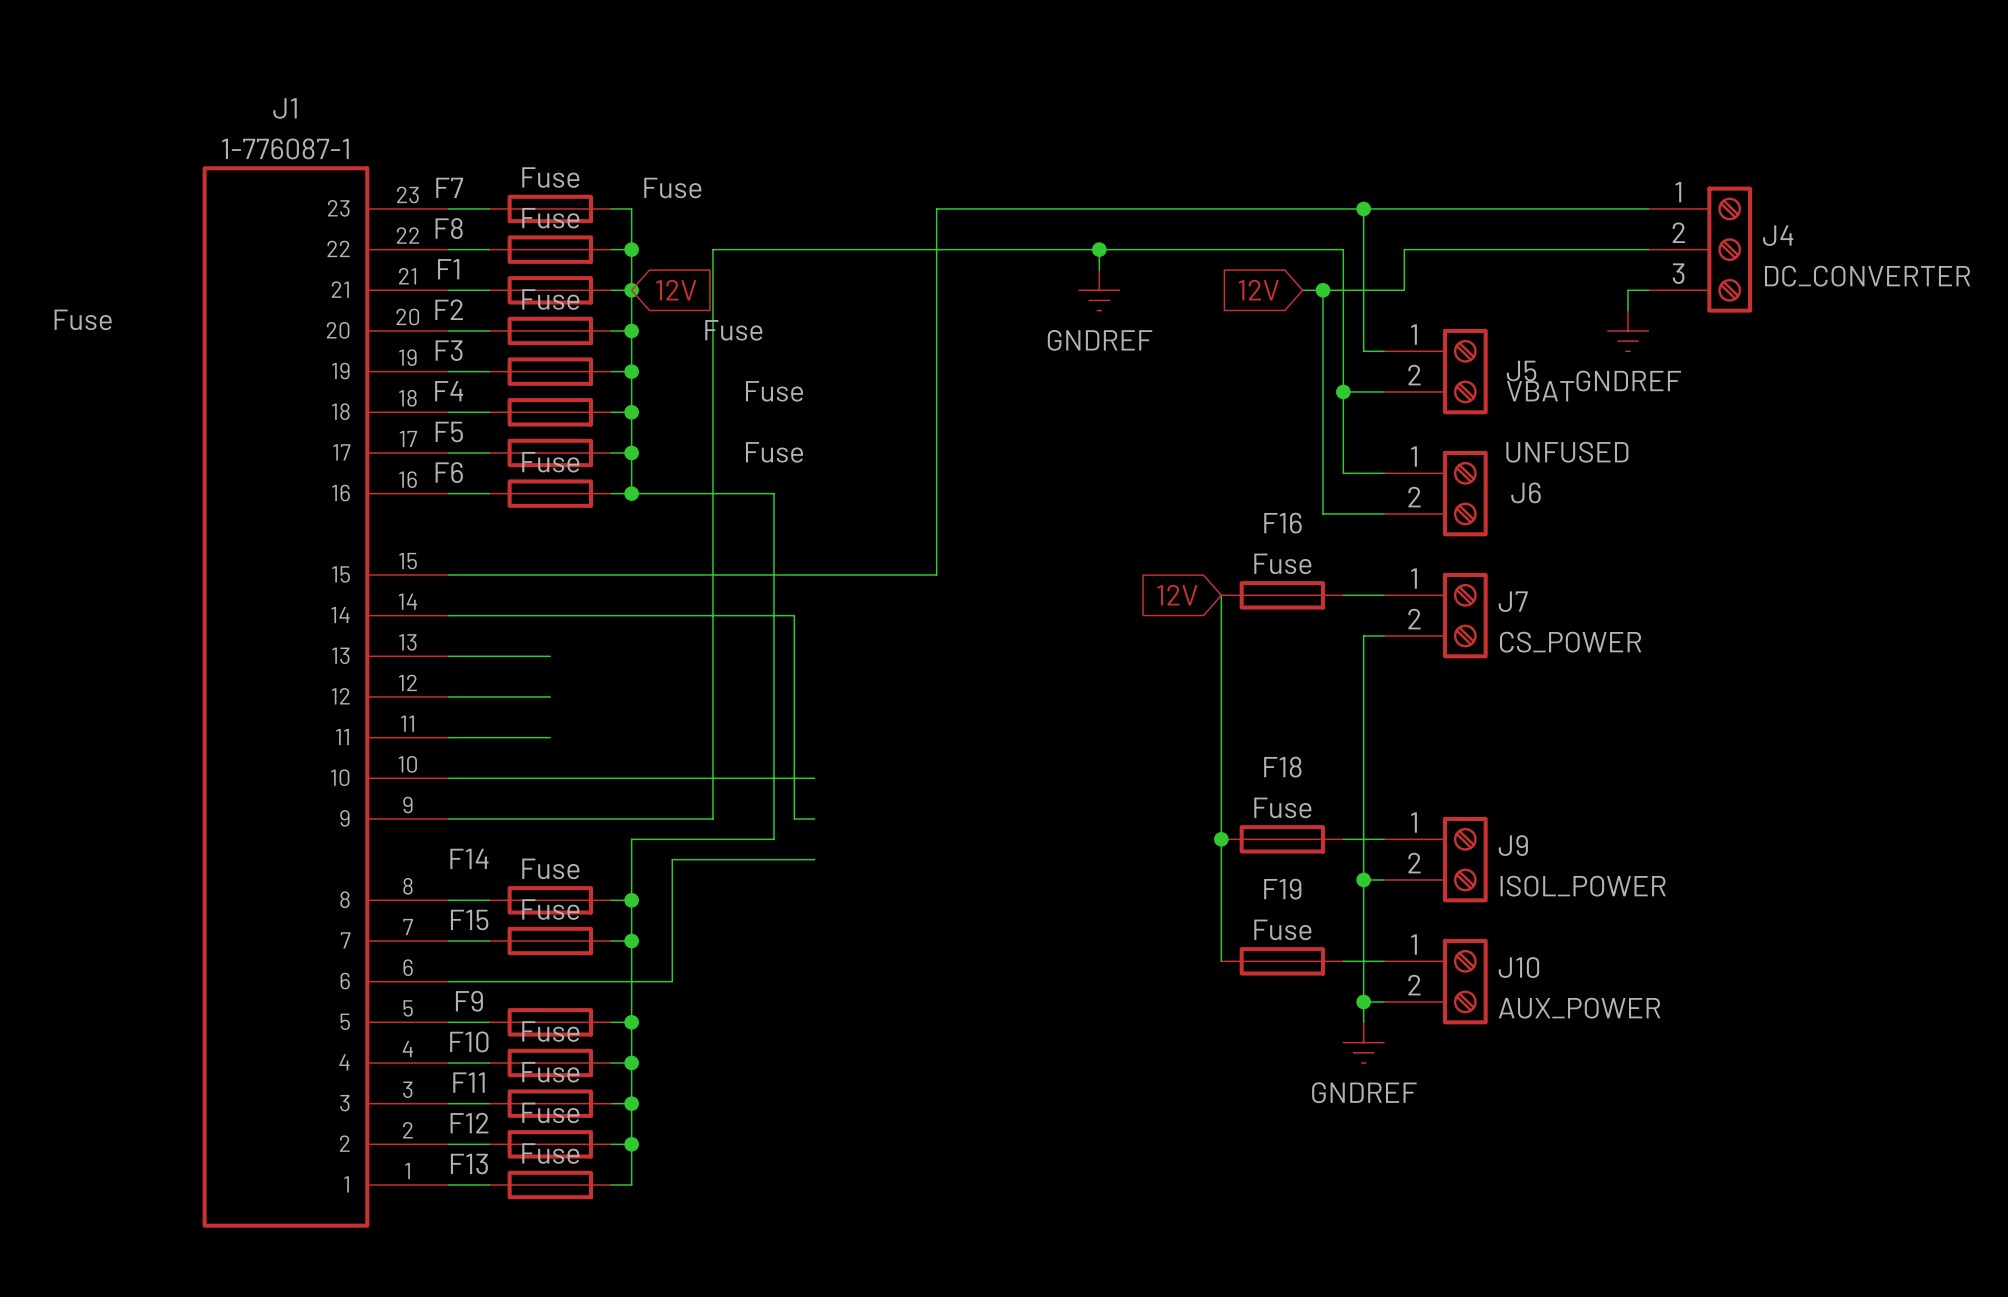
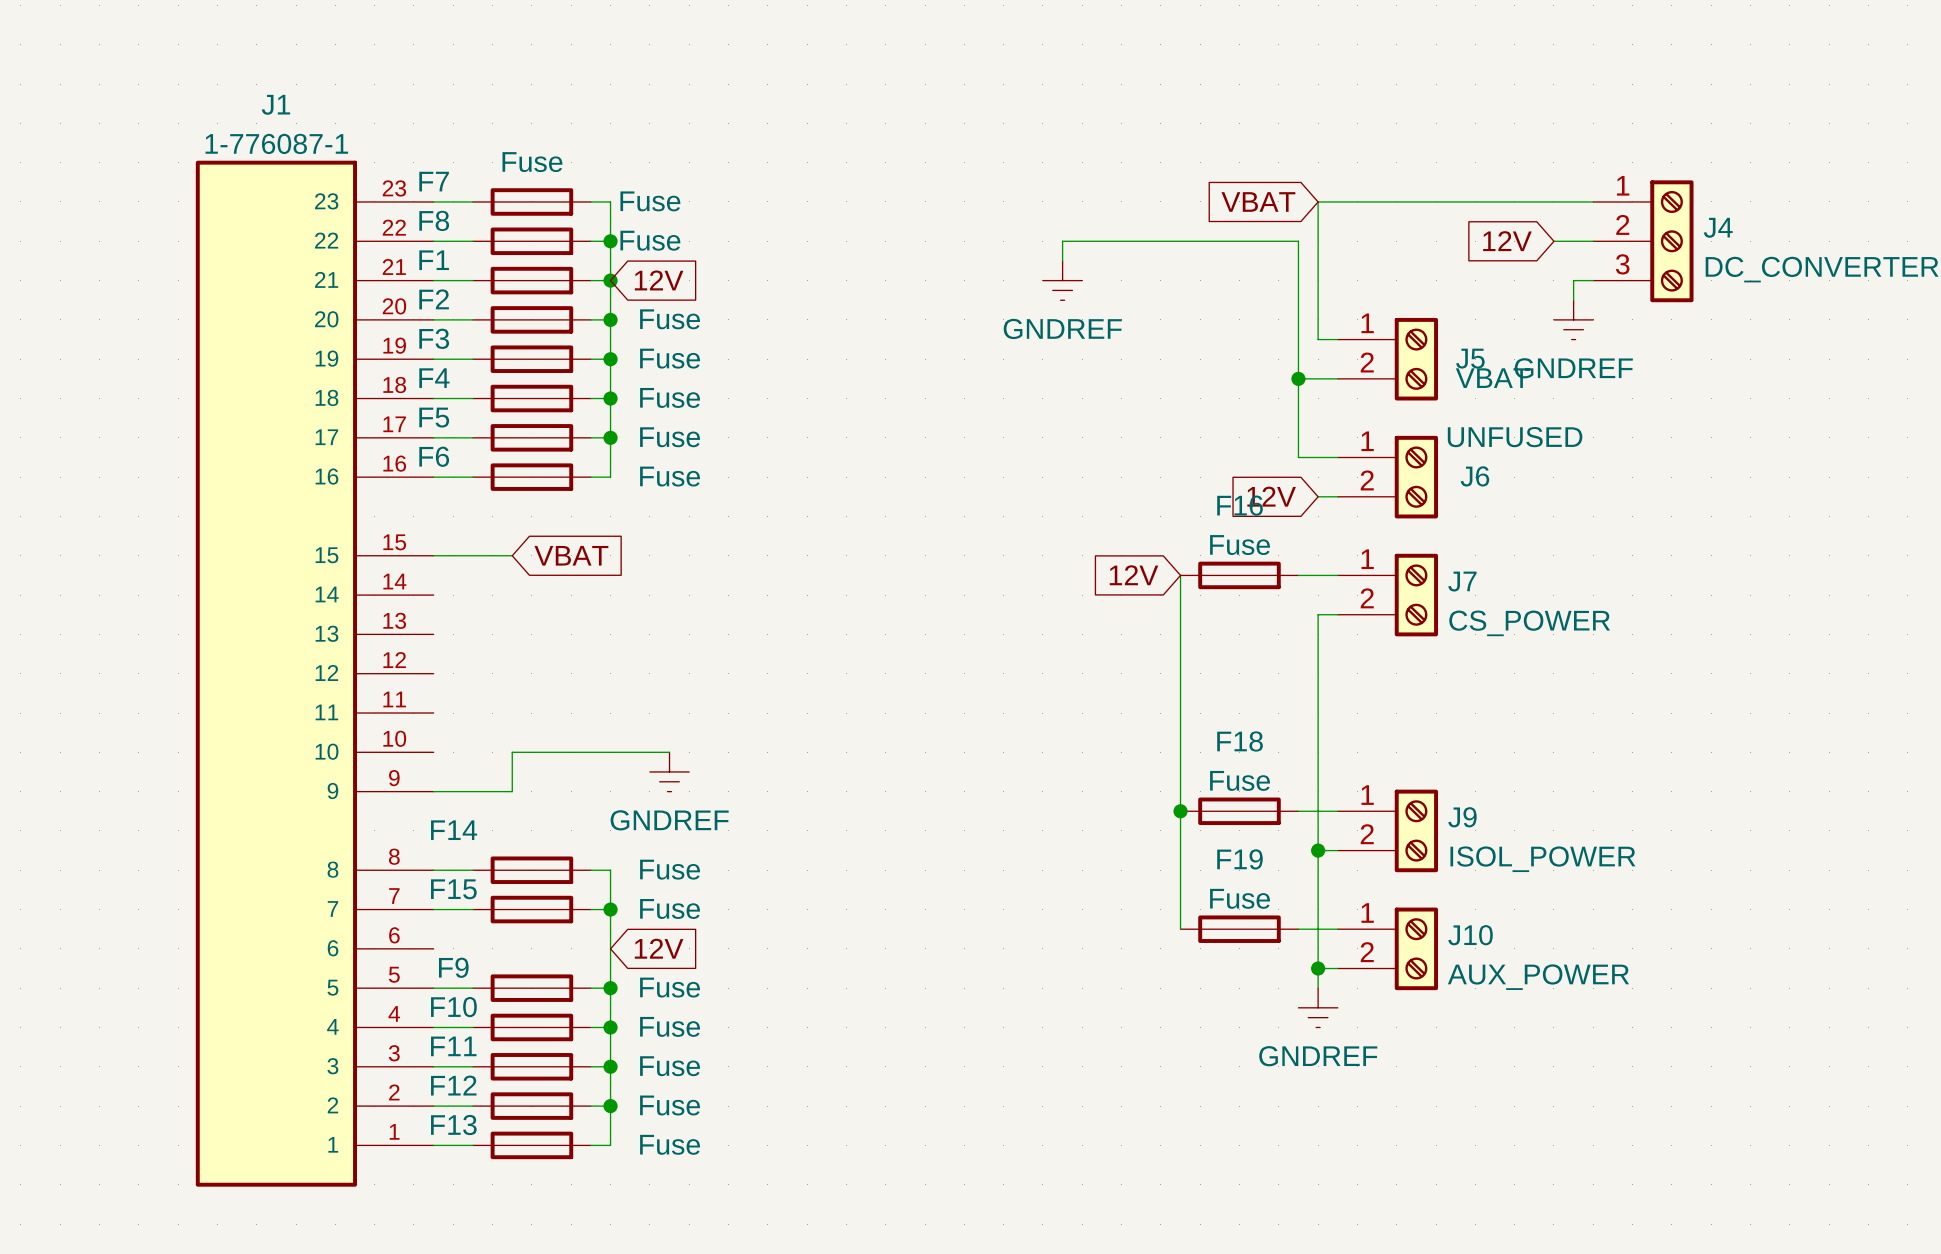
F7 value position: Fuse (550, 177) -> Fuse (650, 201)
F1 value position: Fuse (672, 188) -> Fuse (532, 162)
global label: none -> VBAT (1258, 201)
wire: (1363, 208) (936, 208) (936, 574) (529, 574) -> none
junction: (1363, 208) -> none
F8 value position: Fuse (550, 218) -> Fuse (650, 240)
wire: (1099, 249) (712, 249) (712, 818) (529, 818) -> none
junction: (1099, 249) -> none
global label: none -> 12V (1507, 241)
wire: (1607, 249) (1404, 249) (1404, 290) (1302, 290) -> none
global label: 12V (1258, 290) -> none
wire: (1323, 290) (1323, 513) (1363, 513) -> none
junction: (1323, 290) -> none
F2 value position: Fuse (550, 299) -> Fuse (670, 319)
F9 value position: Fuse (83, 319) -> Fuse (670, 987)
F3 value position: Fuse (733, 330) -> Fuse (670, 358)
F5 value position: Fuse (774, 391) -> Fuse (670, 437)
F4 value position: Fuse (774, 452) -> Fuse (670, 397)
F6 value position: Fuse (550, 462) -> Fuse (670, 476)
wire: (631, 493) (773, 493) (773, 839) (631, 839) (631, 900) -> none
junction: (631, 493) -> none
global label: none -> 12V (1271, 496)
global label: none -> VBAT (571, 555)
wire: (448, 615) (794, 615) (794, 818) (814, 818) -> none
wire: (448, 656) (550, 656) -> none
wire: (448, 696) (550, 696) -> none
wire: (448, 737) (550, 737) -> none
wire: (448, 778) (529, 778) -> (512, 791) (512, 752)
wire: (692, 778) (814, 778) -> none
power symbol: none -> GNDREF (669, 771)
wire: (814, 859) (672, 859) (672, 981) (448, 981) -> none
F14 value position: Fuse (550, 868) -> Fuse (670, 869)
junction: (631, 900) -> none
F15 value position: Fuse (550, 909) -> Fuse (670, 908)
global label: none -> 12V (659, 948)
F10 value position: Fuse (550, 1031) -> Fuse (670, 1026)
F11 value position: Fuse (550, 1072) -> Fuse (670, 1066)
F12 value position: Fuse (550, 1112) -> Fuse (670, 1105)
F13 value position: Fuse (550, 1153) -> Fuse (670, 1144)

